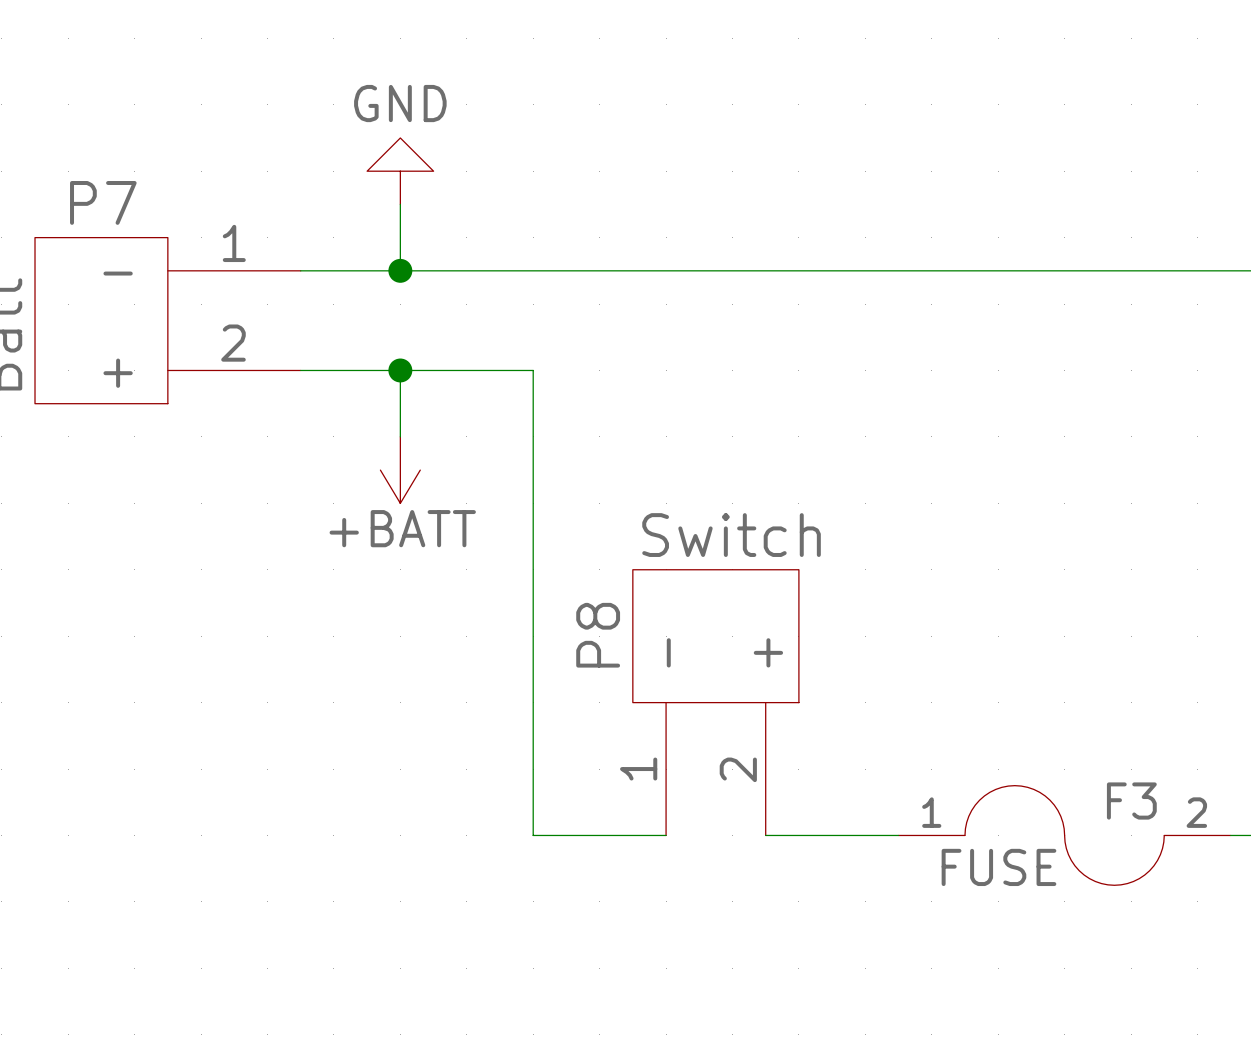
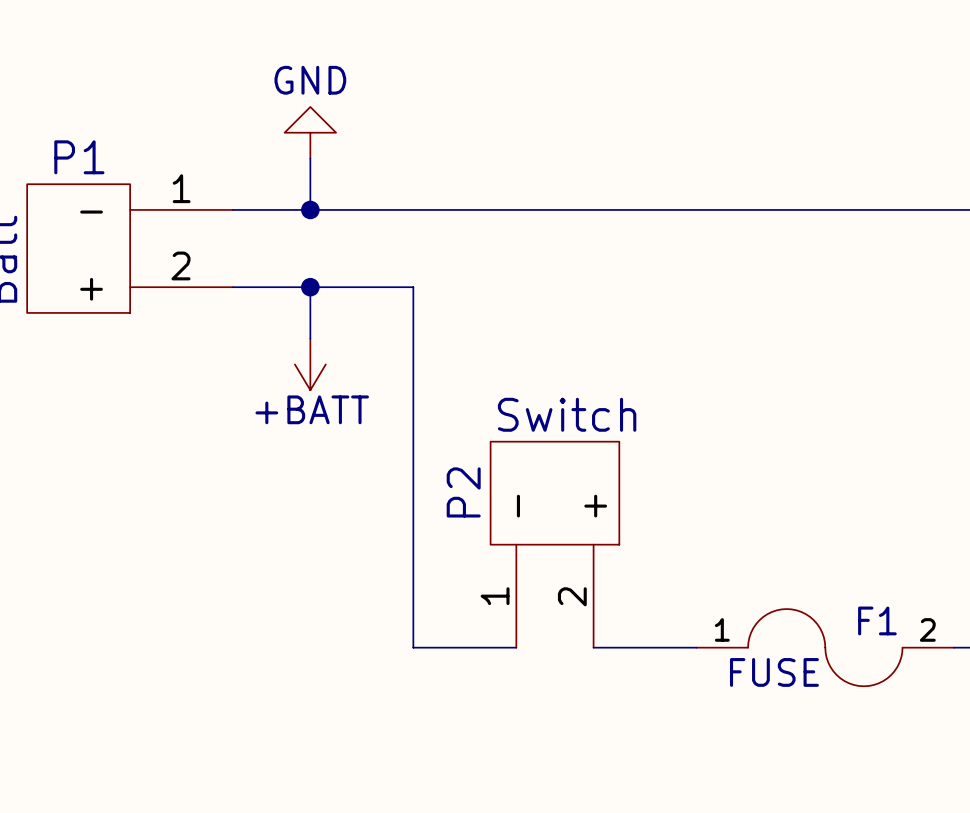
P7 name: P7 (103, 202) -> P1 (79, 157)
P8 name: P8 (598, 635) -> P2 (463, 492)
F3 name: F3 (1131, 801) -> F1 (877, 620)

